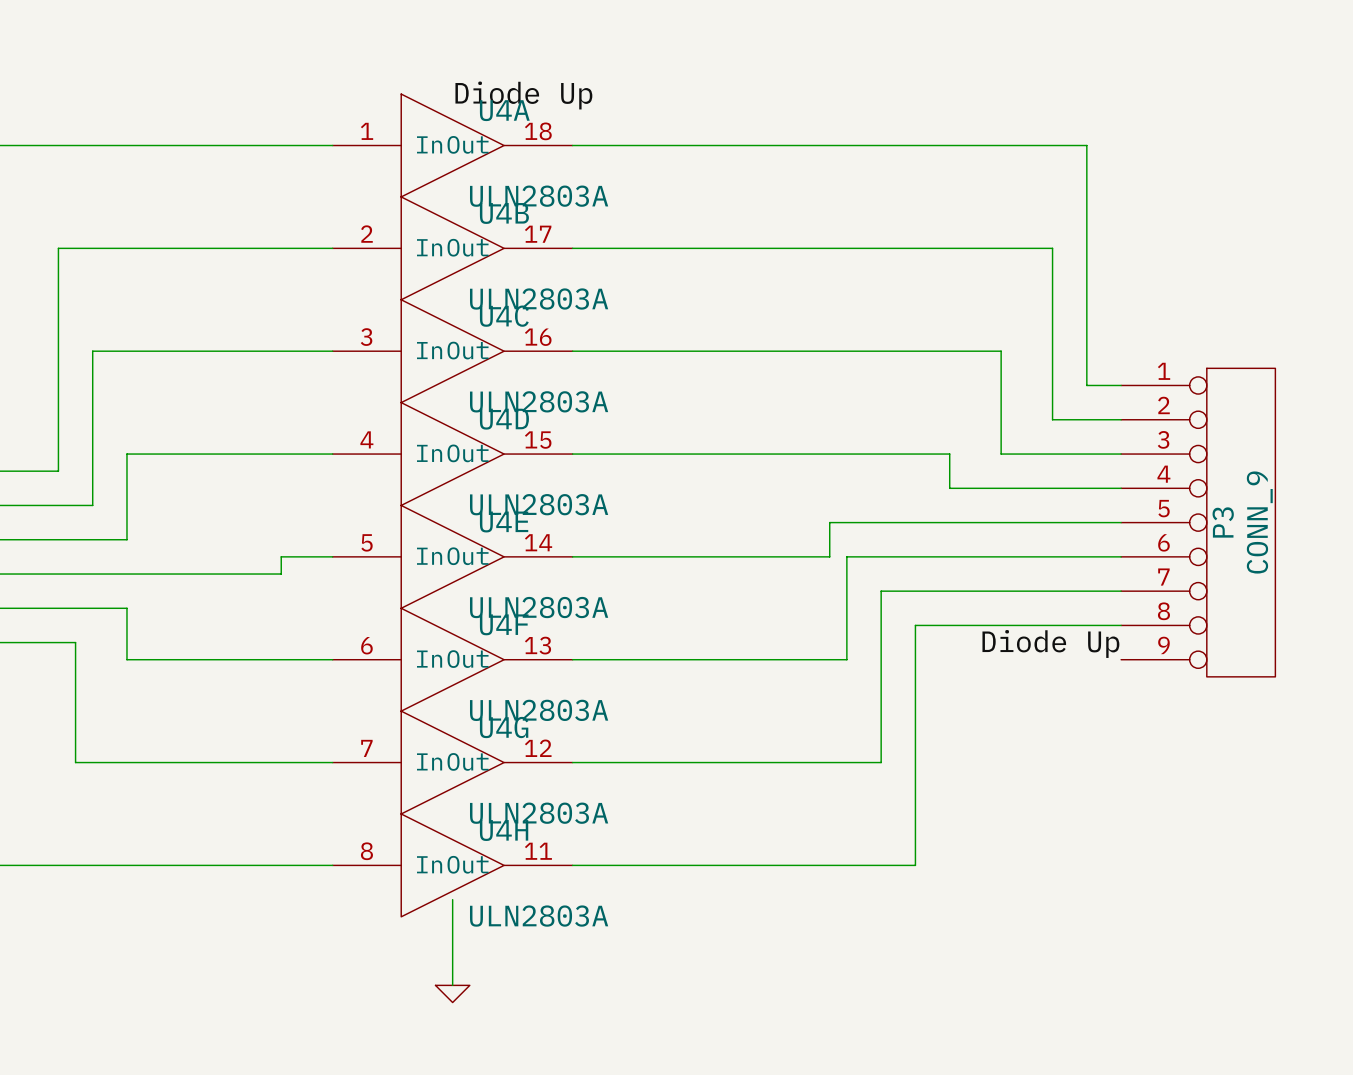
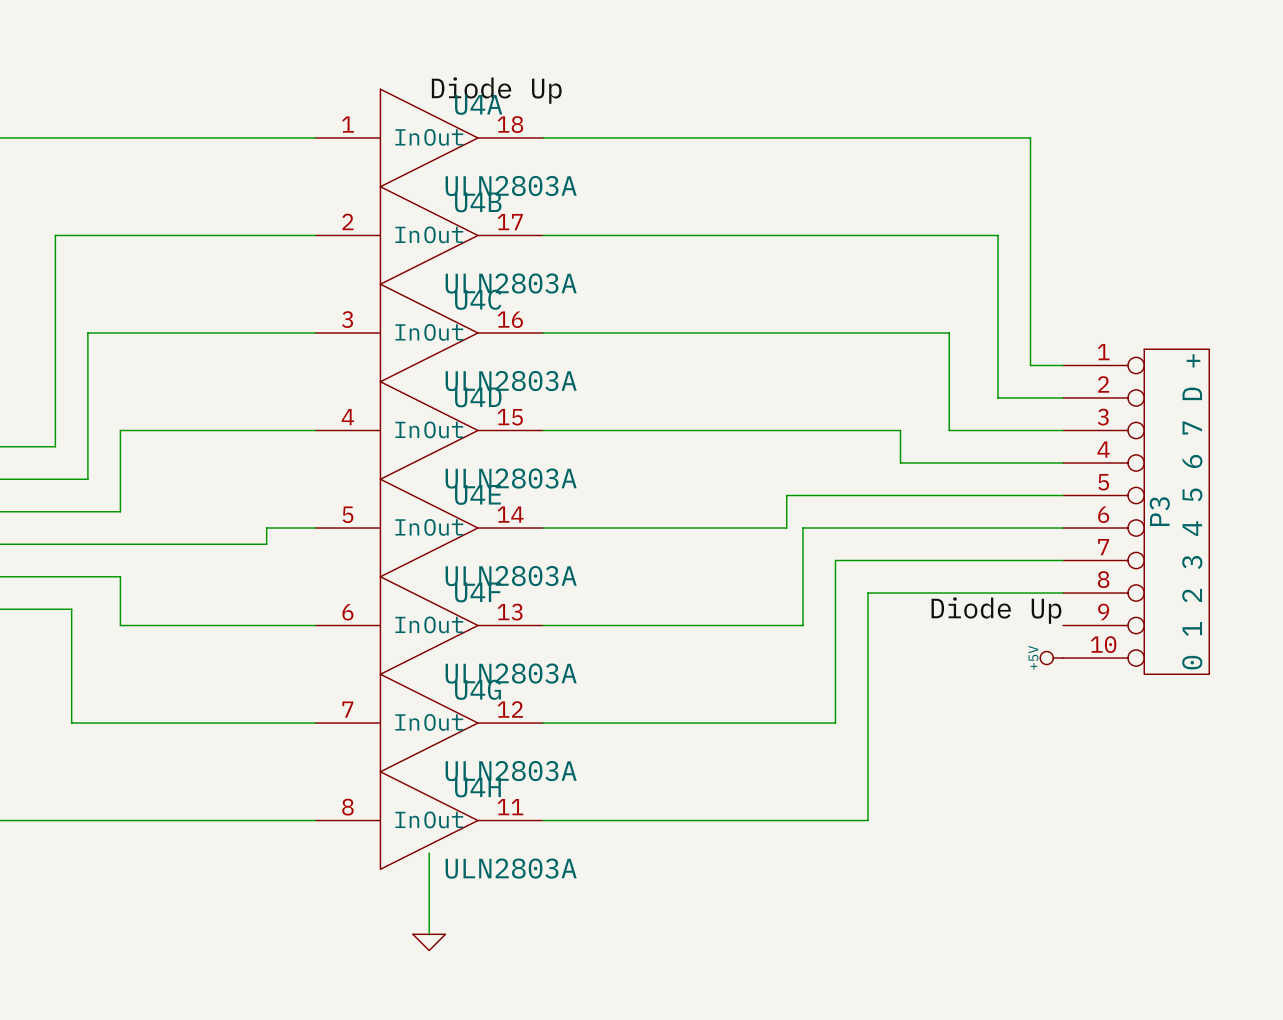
P3 symbol: [1121, 368, 1276, 677] -> [1063, 349, 1210, 675]
P3 value: CONN_9 (1259, 522) -> 0 1 2 3 4 5 6 7 D + (1192, 511)
power symbol: none -> +5V (1051, 658)

